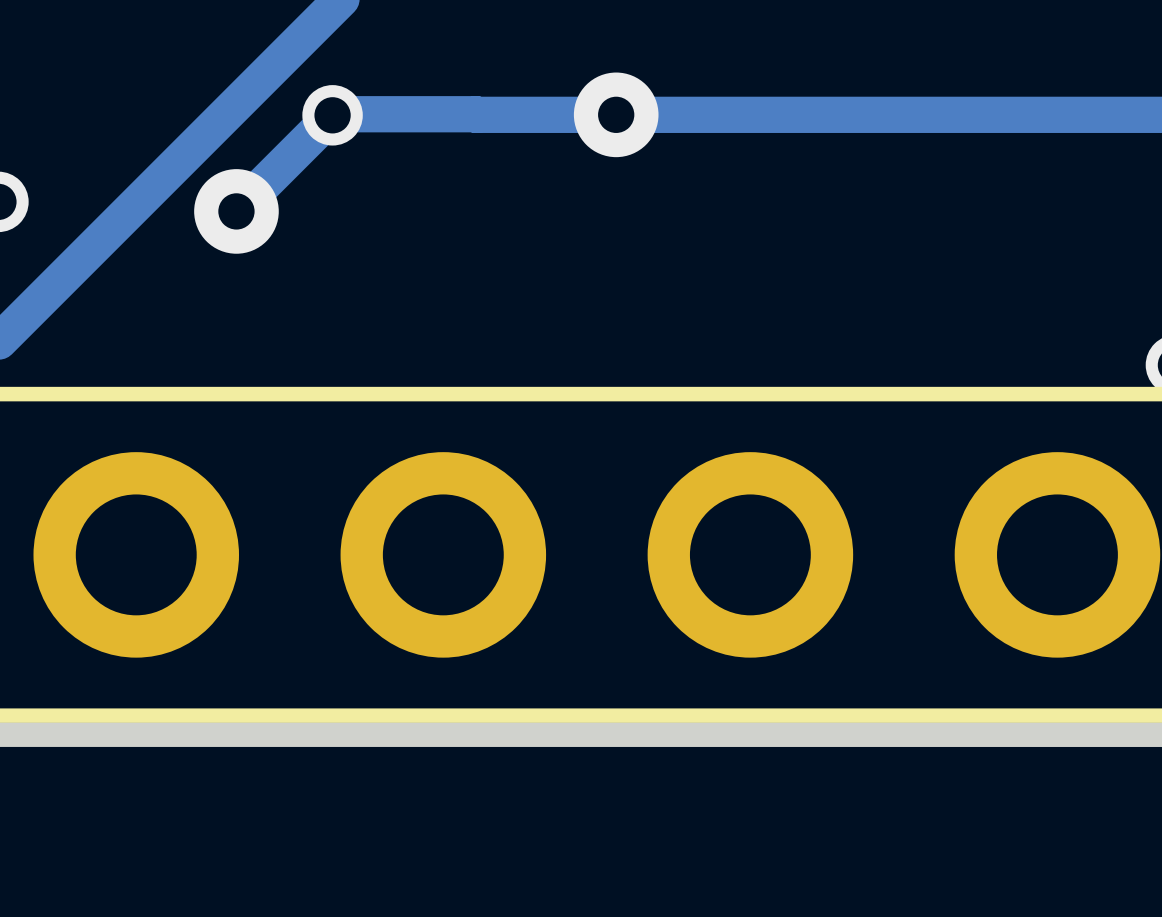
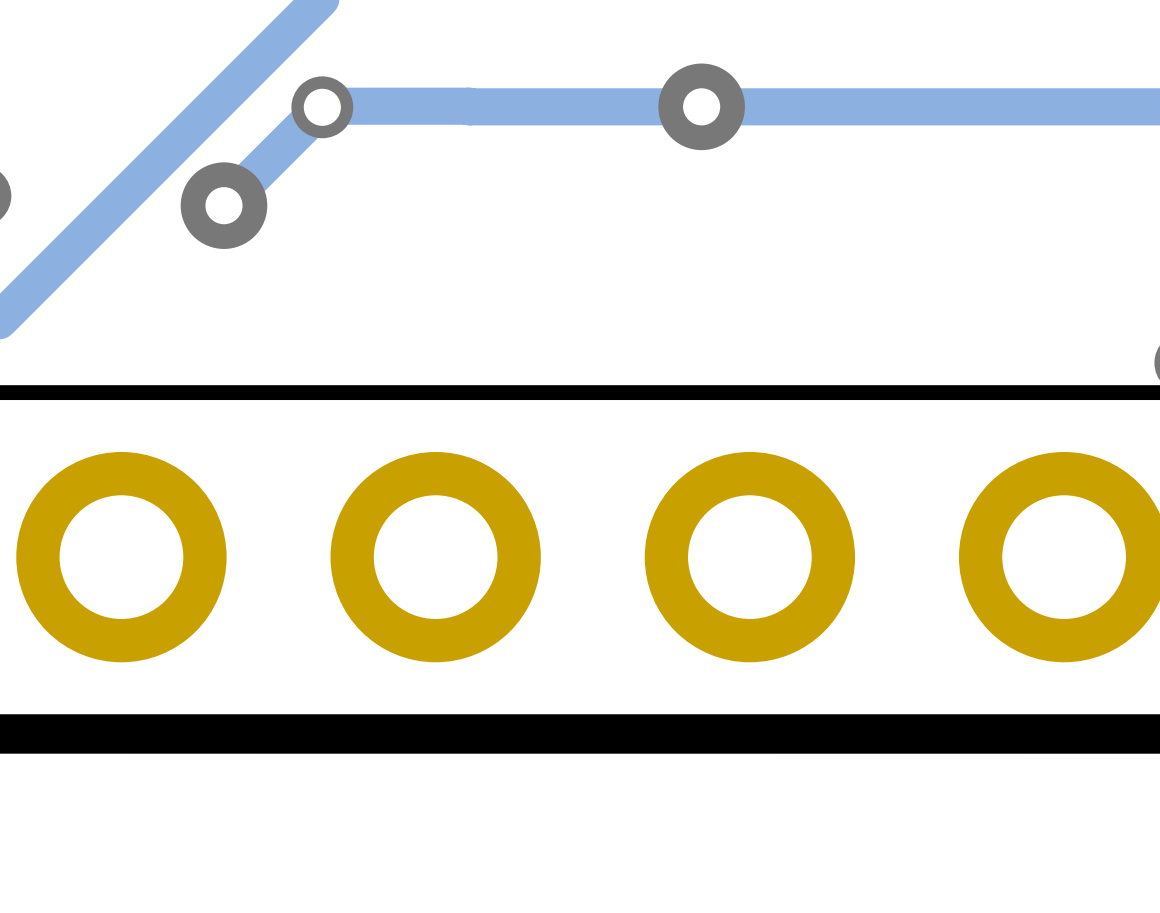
via position: (616, 114) -> (701, 106)

